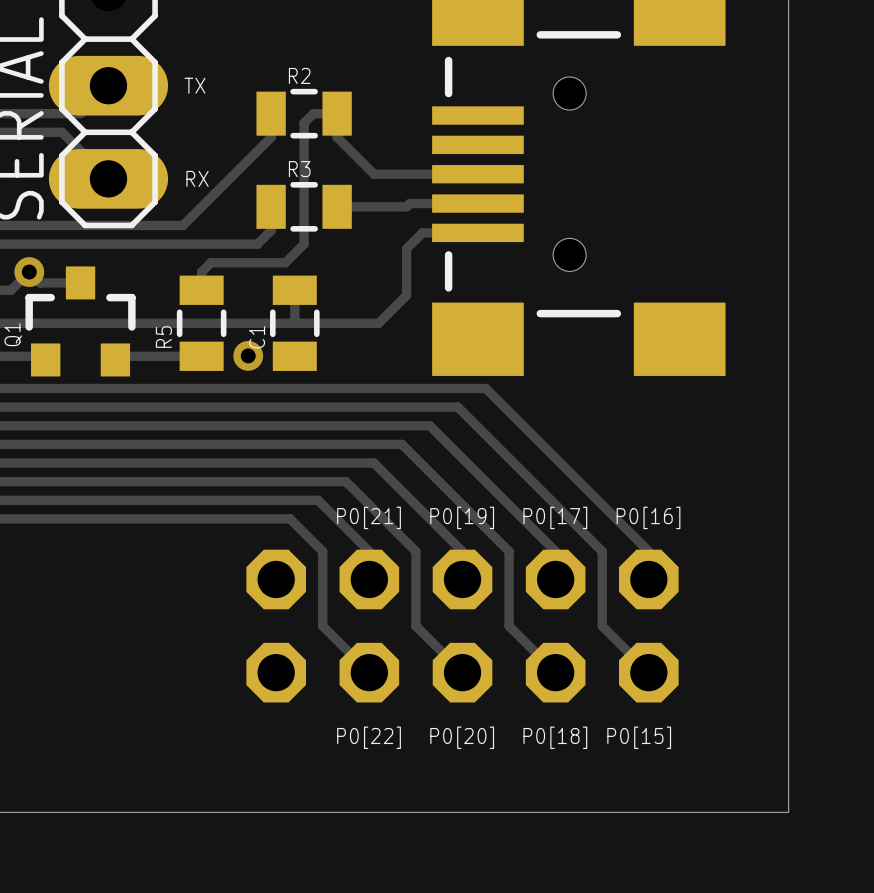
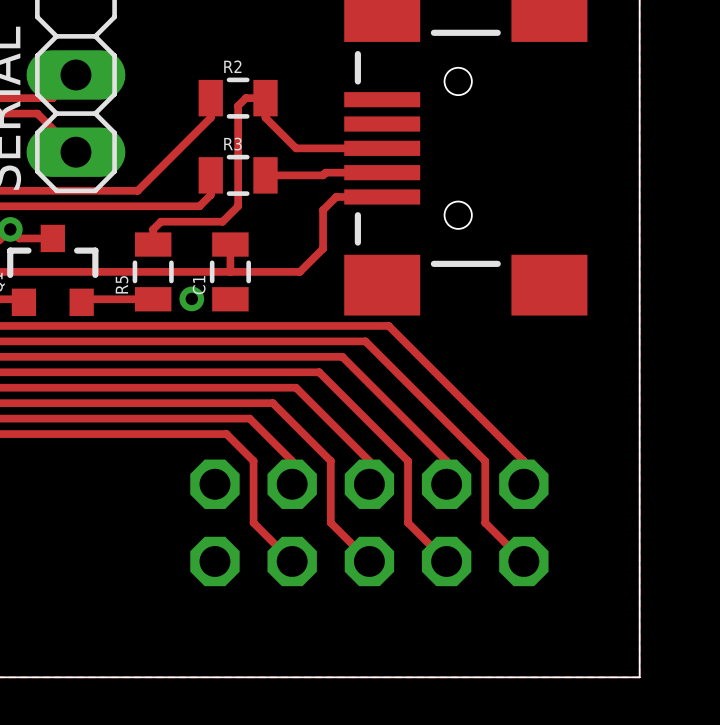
text: TX (194, 85) -> none
text: RX (197, 178) -> none
text: P0[21] (369, 517) -> none
text: P0[19] (462, 517) -> none
text: P0[17] (555, 517) -> none
text: P0[16] (648, 517) -> none
text: P0[22] (369, 737) -> none
text: P0[20] (462, 737) -> none
text: P0[18] (555, 737) -> none
text: P0[15] (639, 737) -> none

